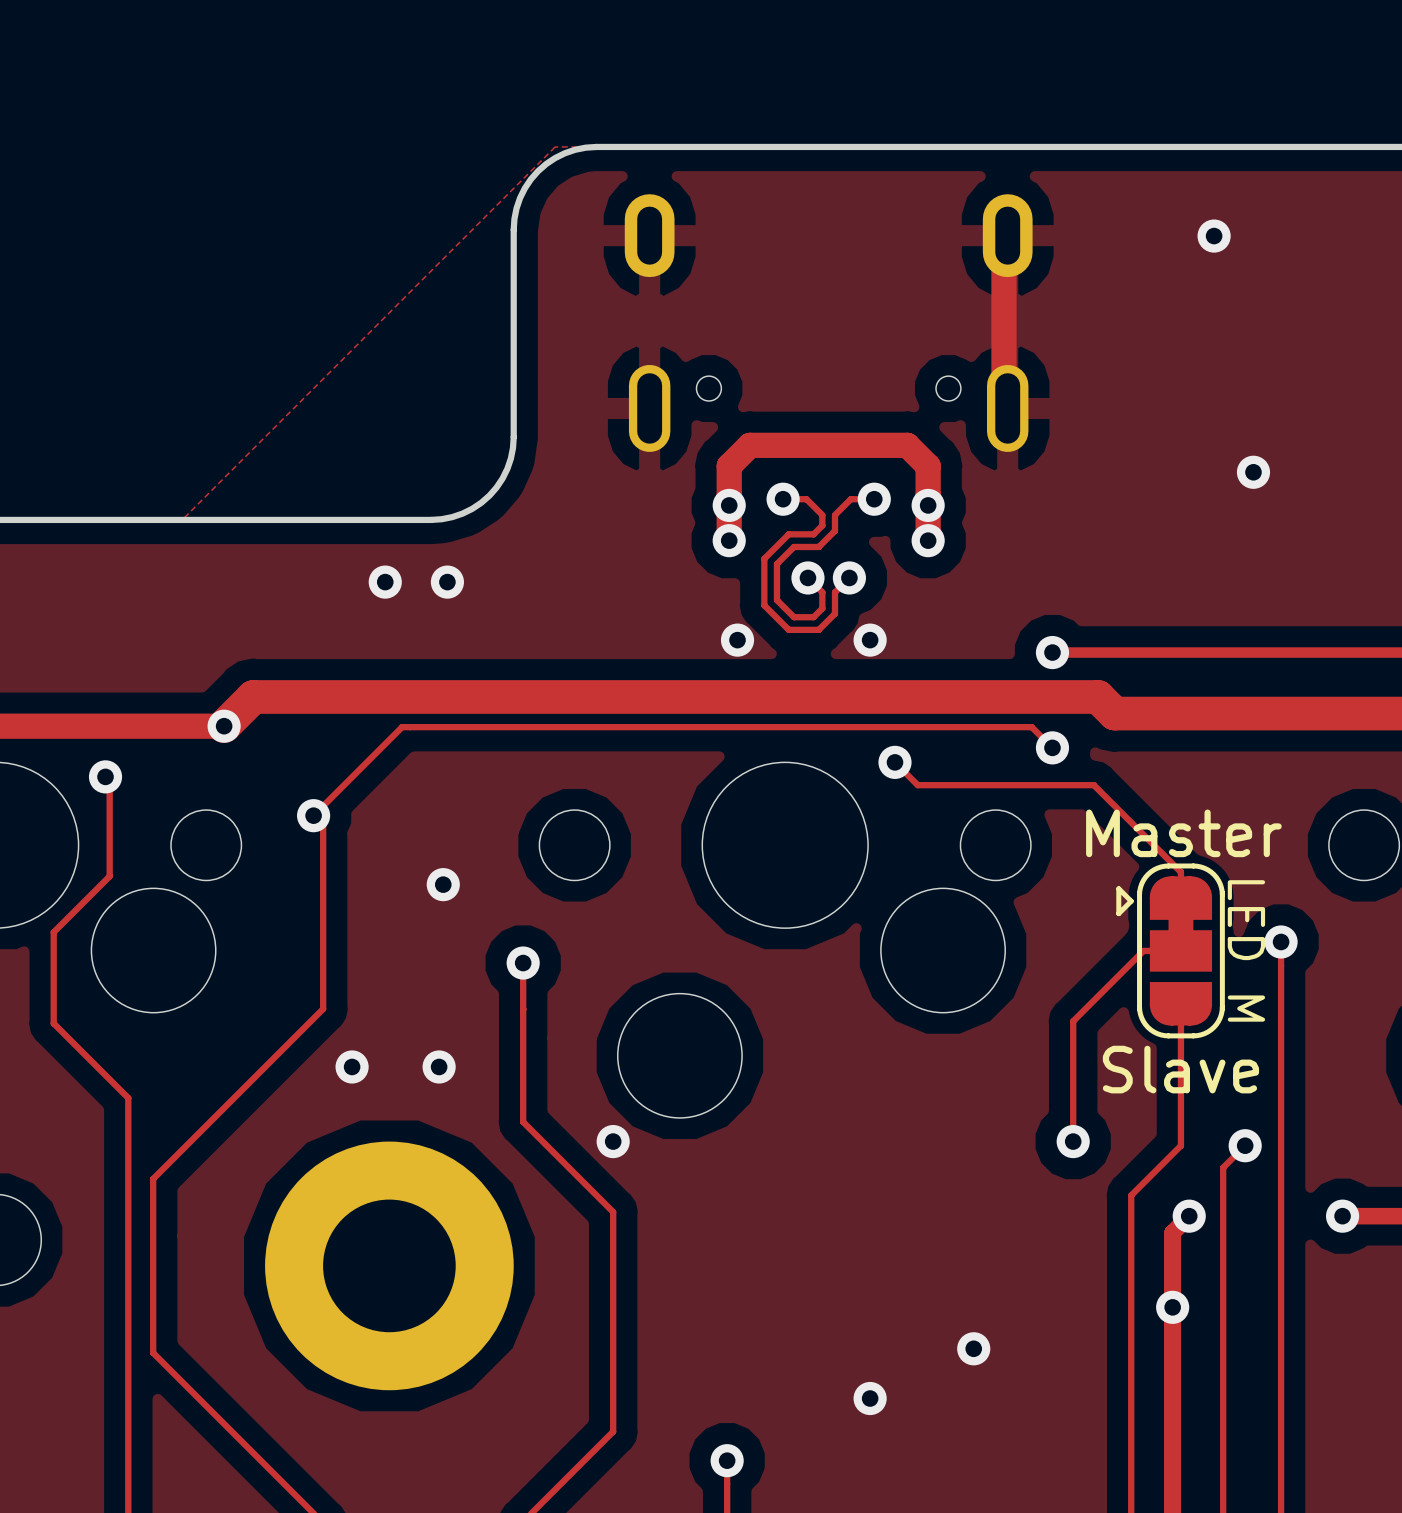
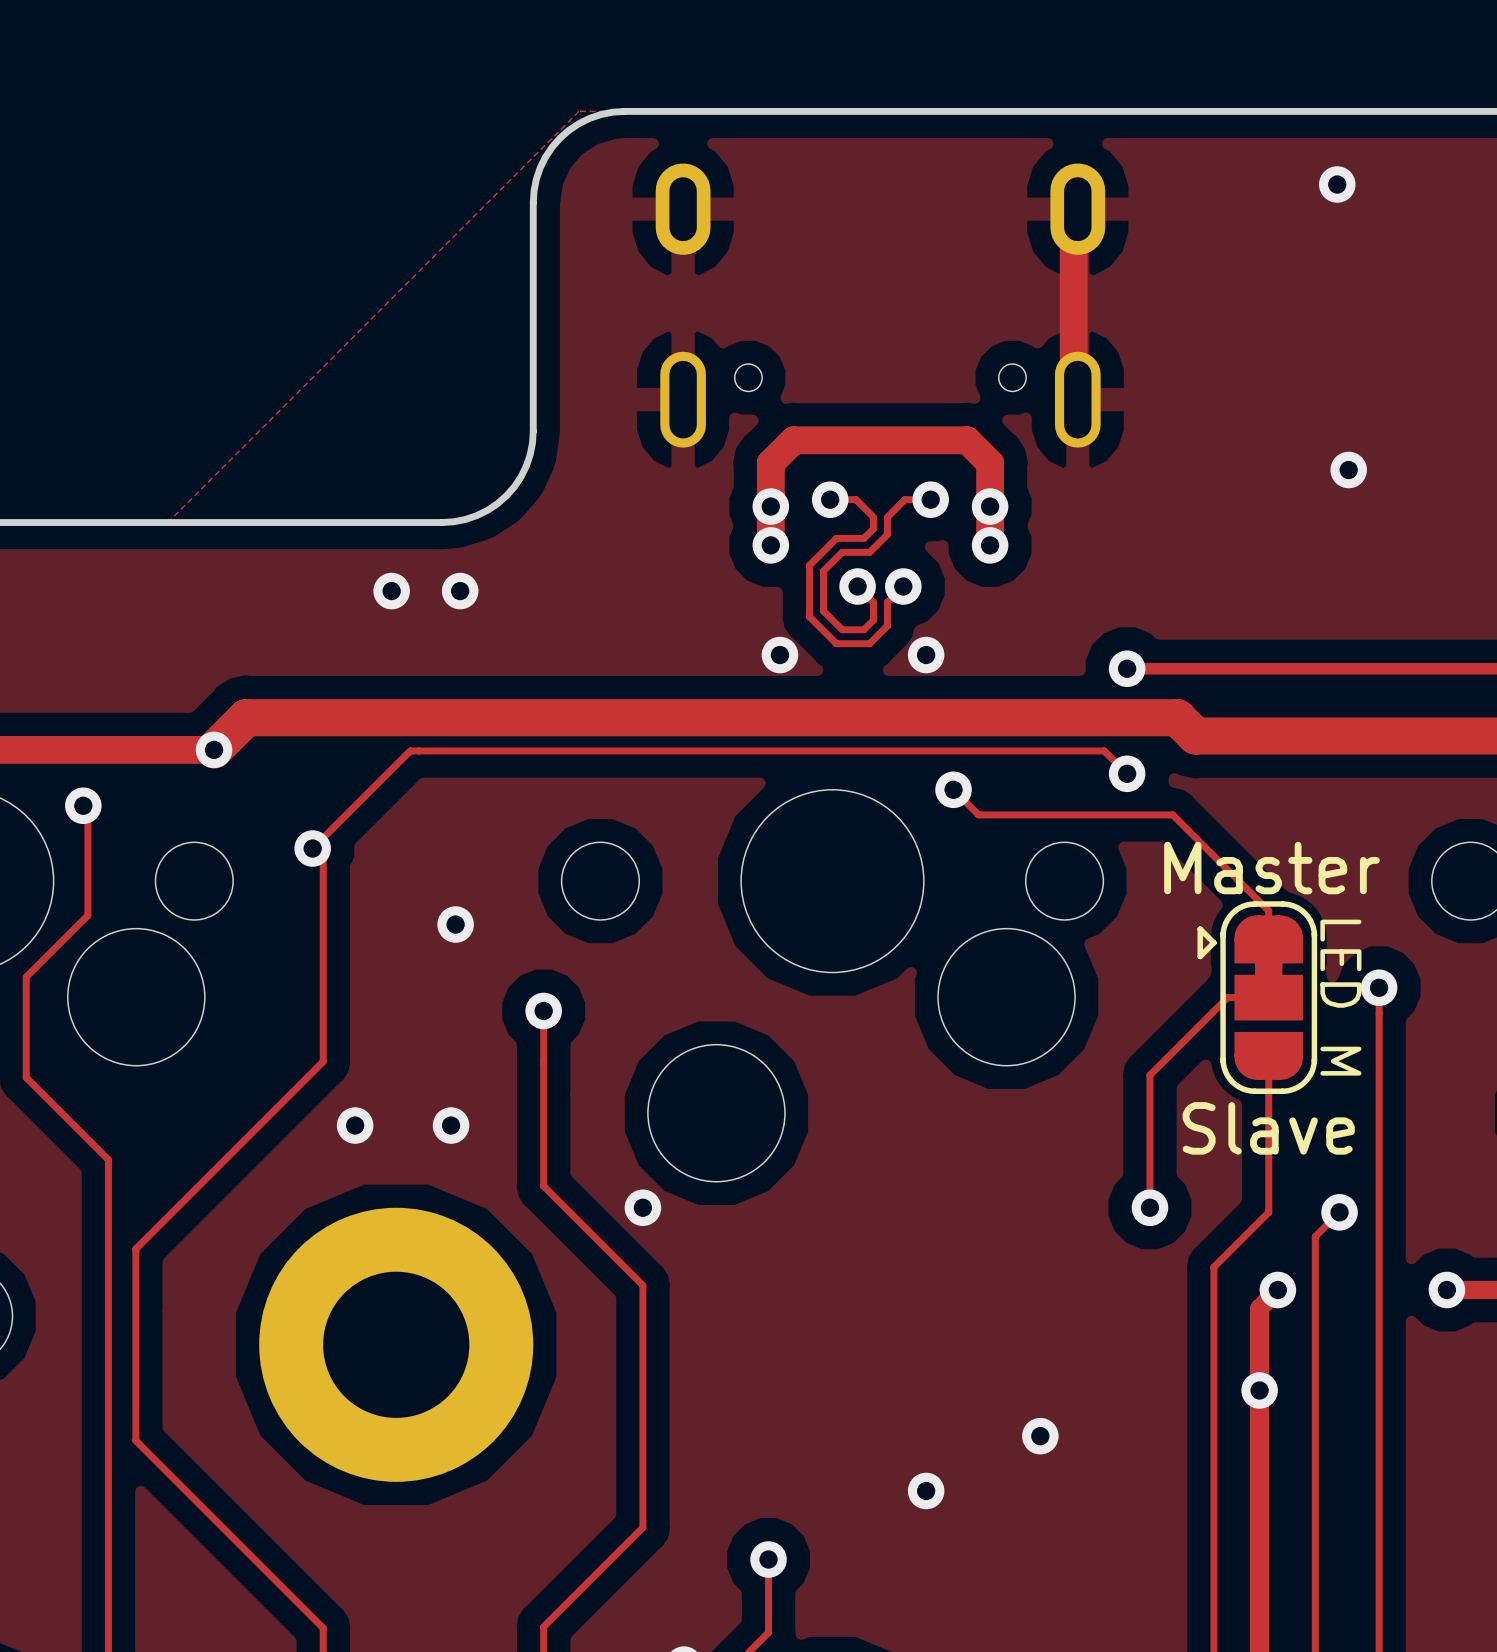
via position: (1214, 236) -> (1337, 184)

